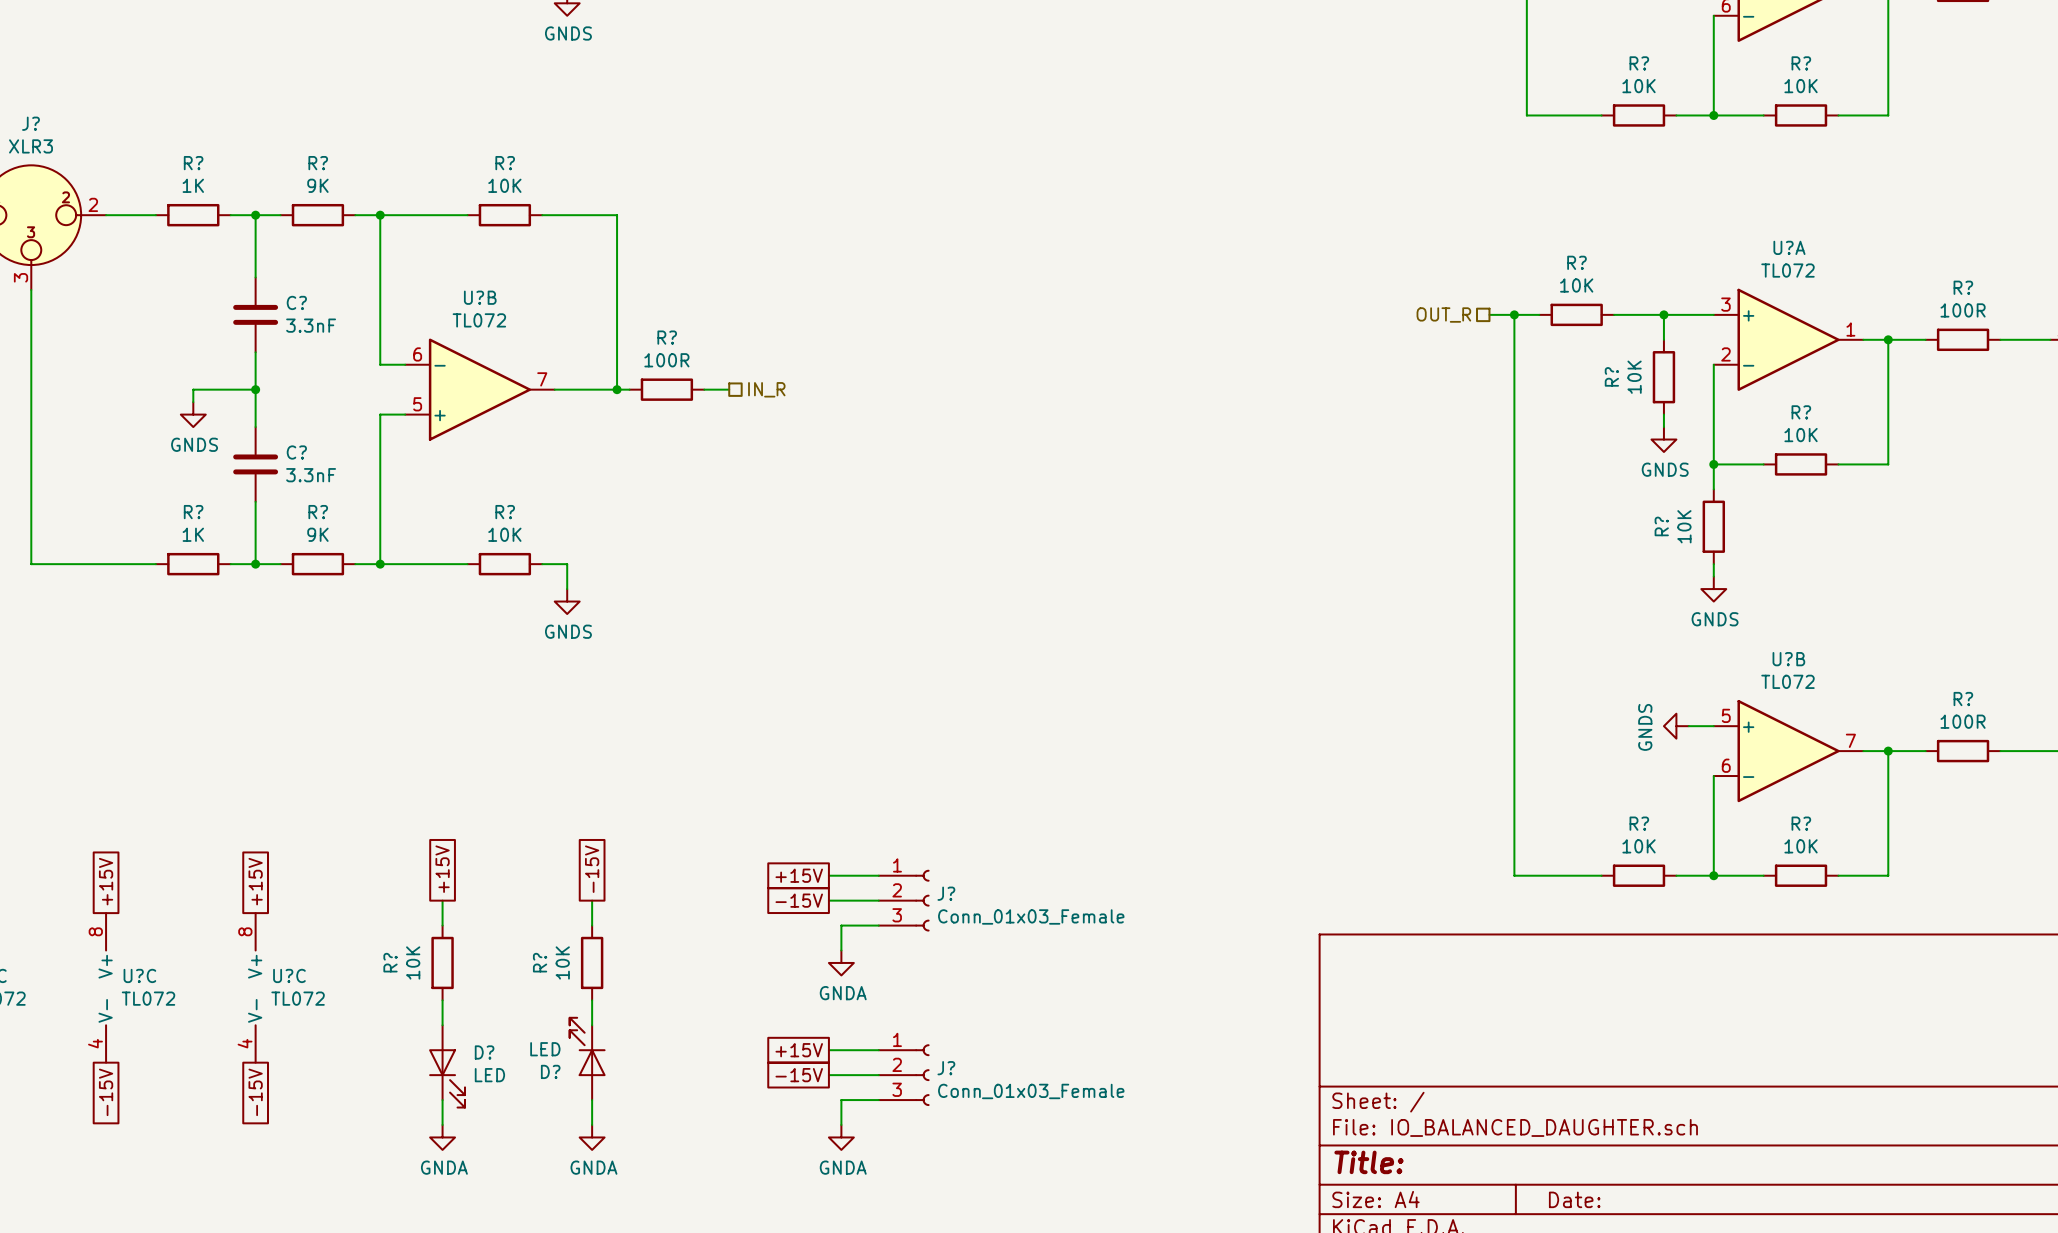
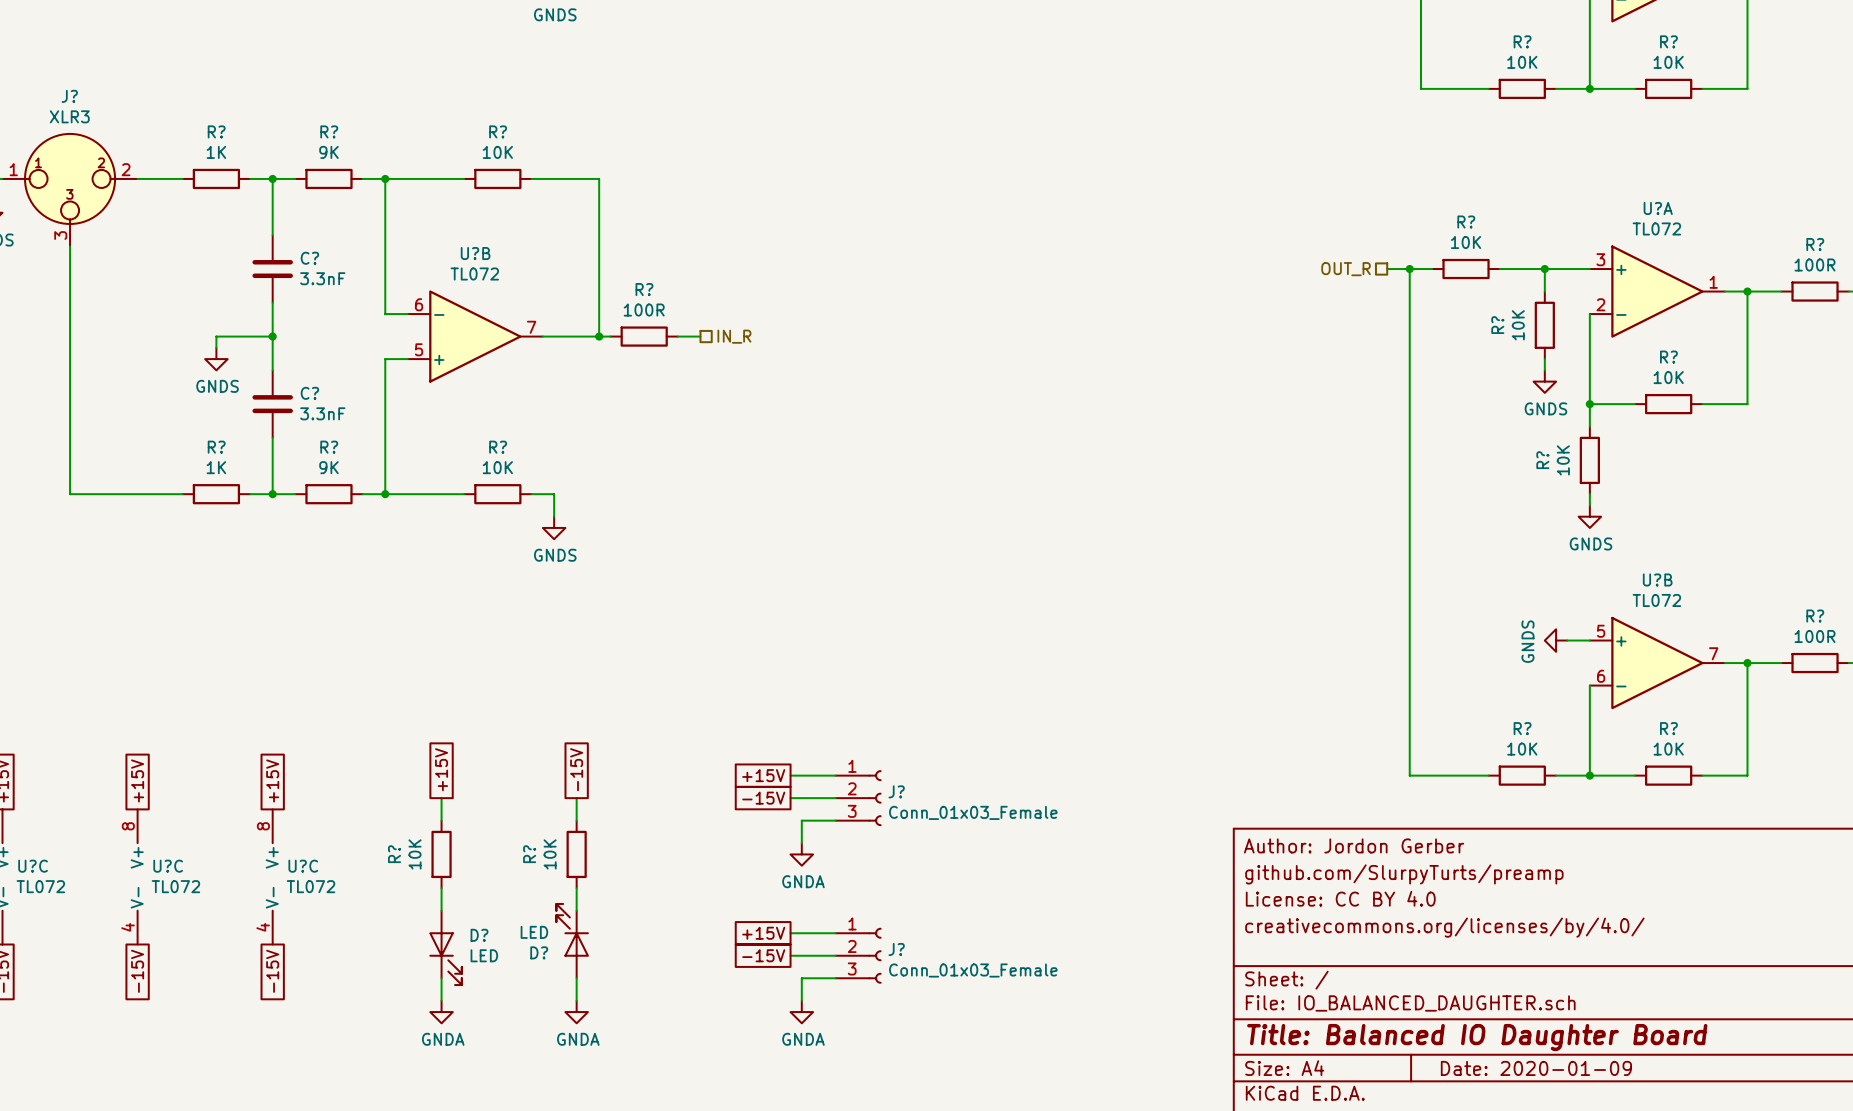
title block: none -> Author: Jordon Gerber (1354, 845)
title block: none -> github.com/SlurpyTurts/preamp (1404, 874)
title block: none -> License: CC BY 4.0 (1340, 898)
title block: none -> creativecommons.org/licenses/by/4.0/ (1444, 927)
title block: Title: (1368, 1162) -> Title: Balanced IO Daughter Board (1477, 1037)
title block: Date: (1574, 1199) -> Date: 2020-01-09 (1536, 1068)

